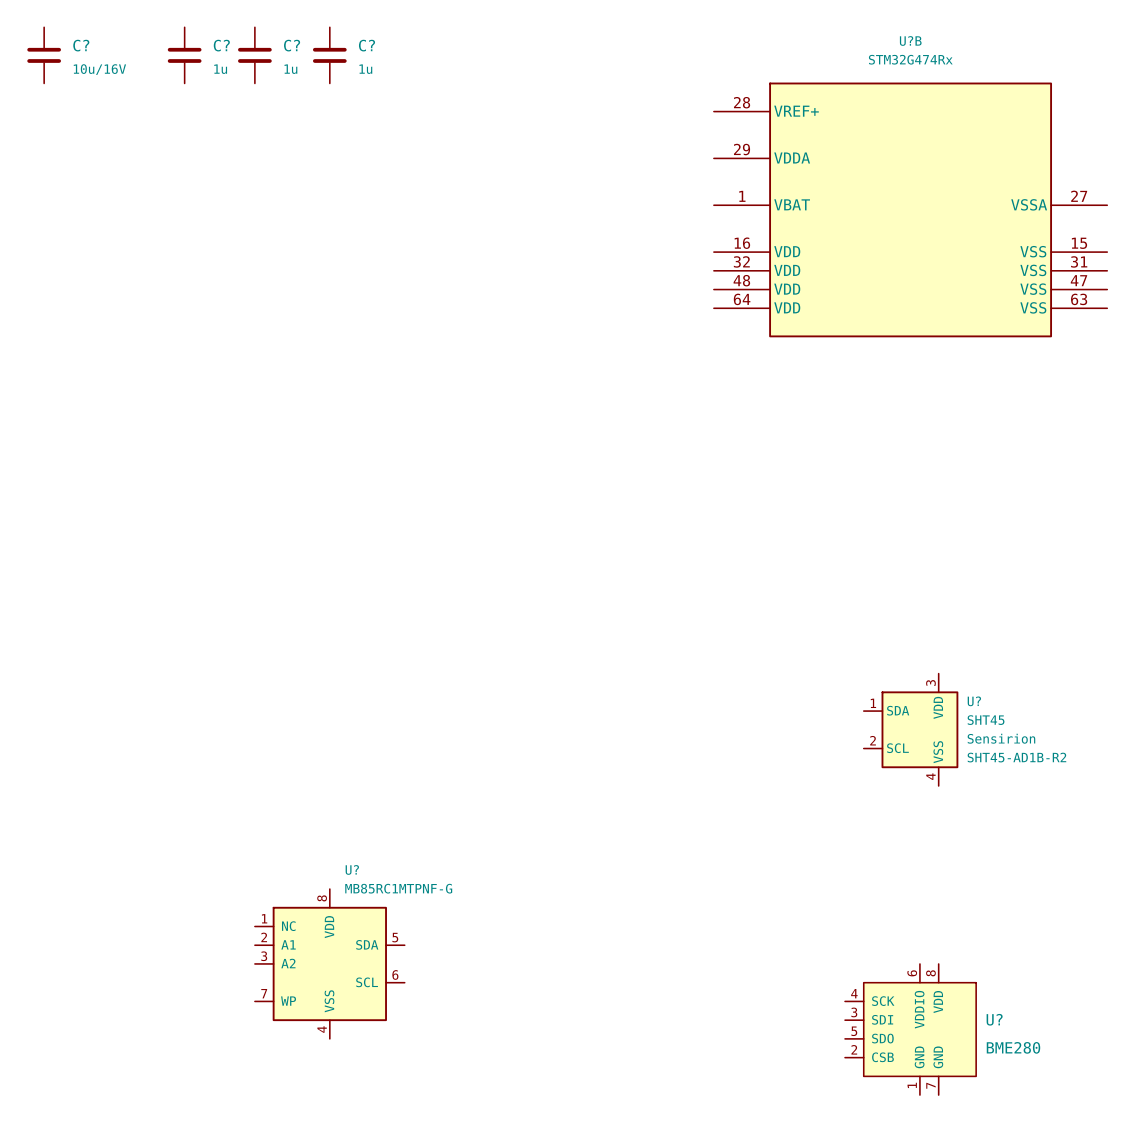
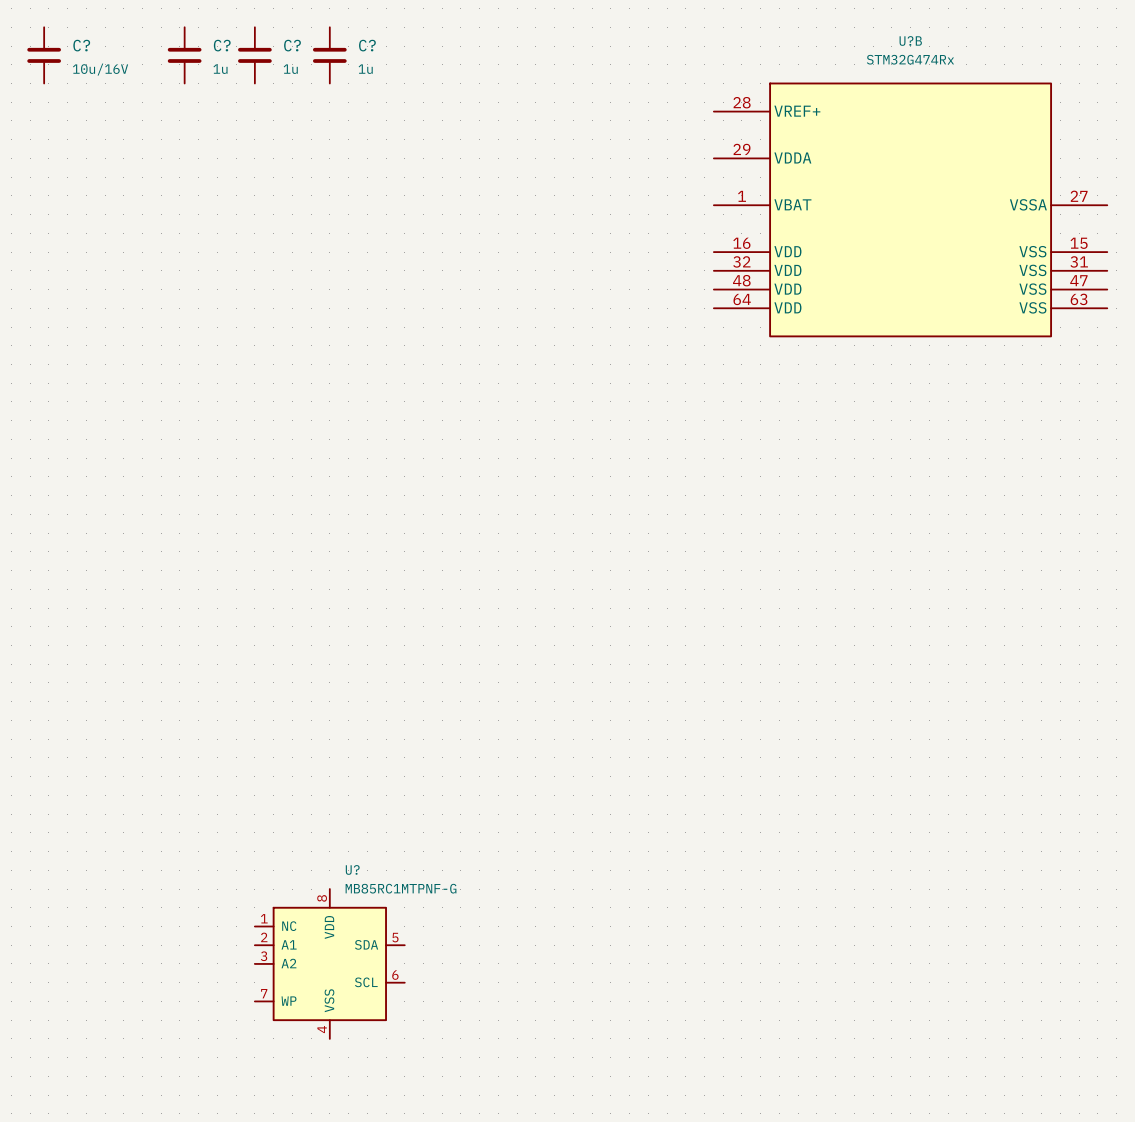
U?: SHT45 (911, 729) -> none
U?: BME280 (910, 1029) -> none

